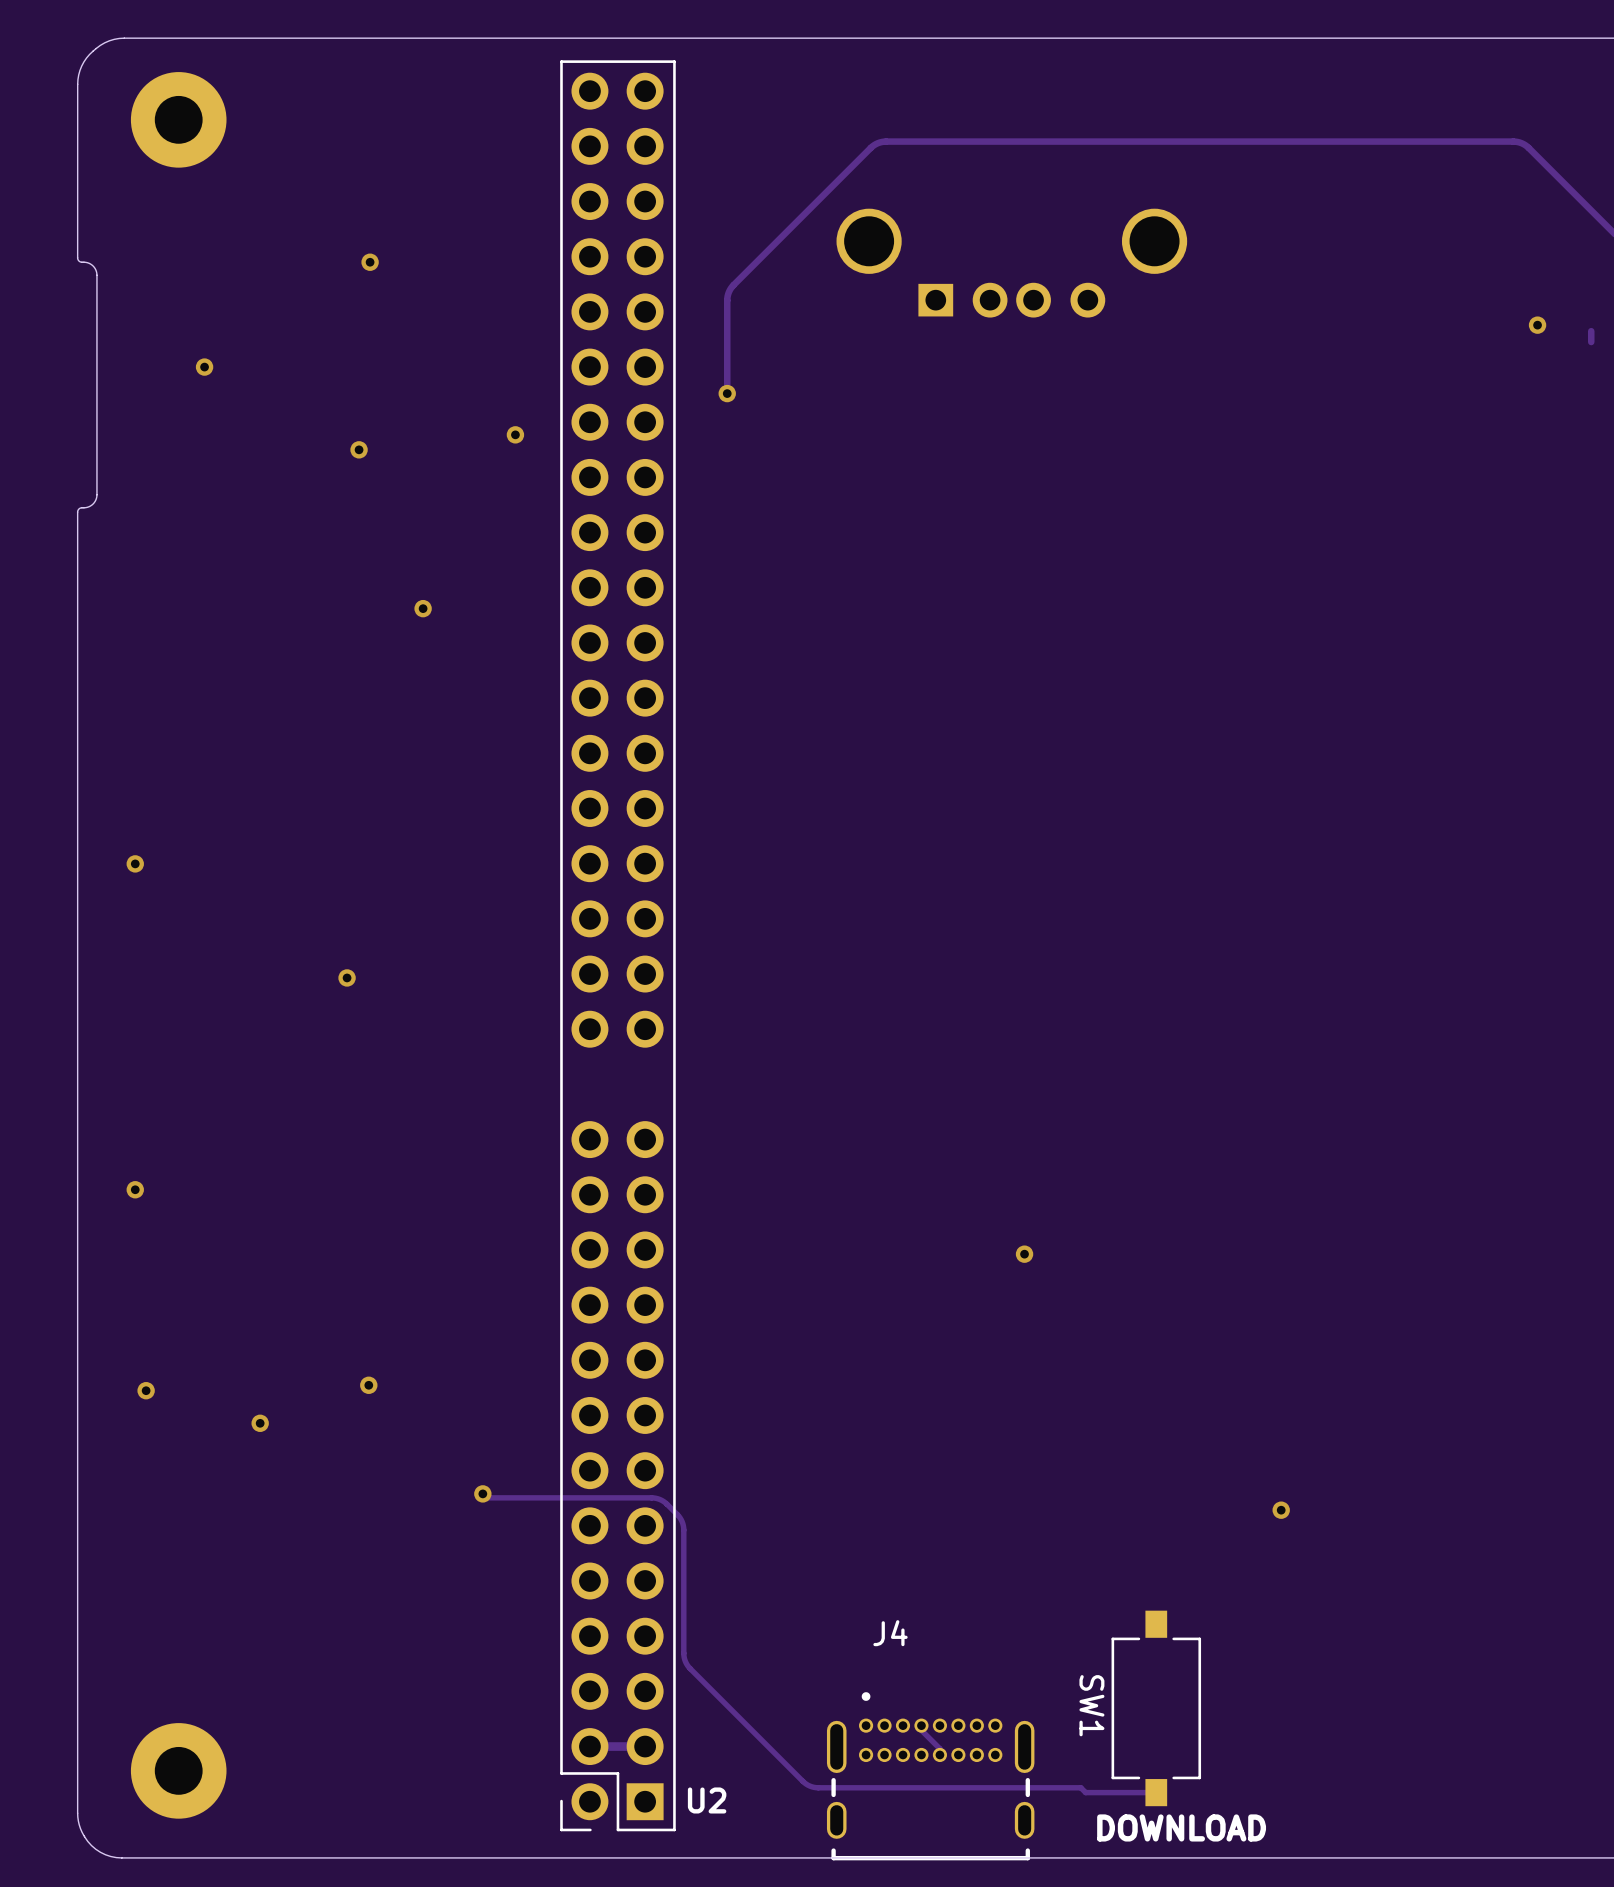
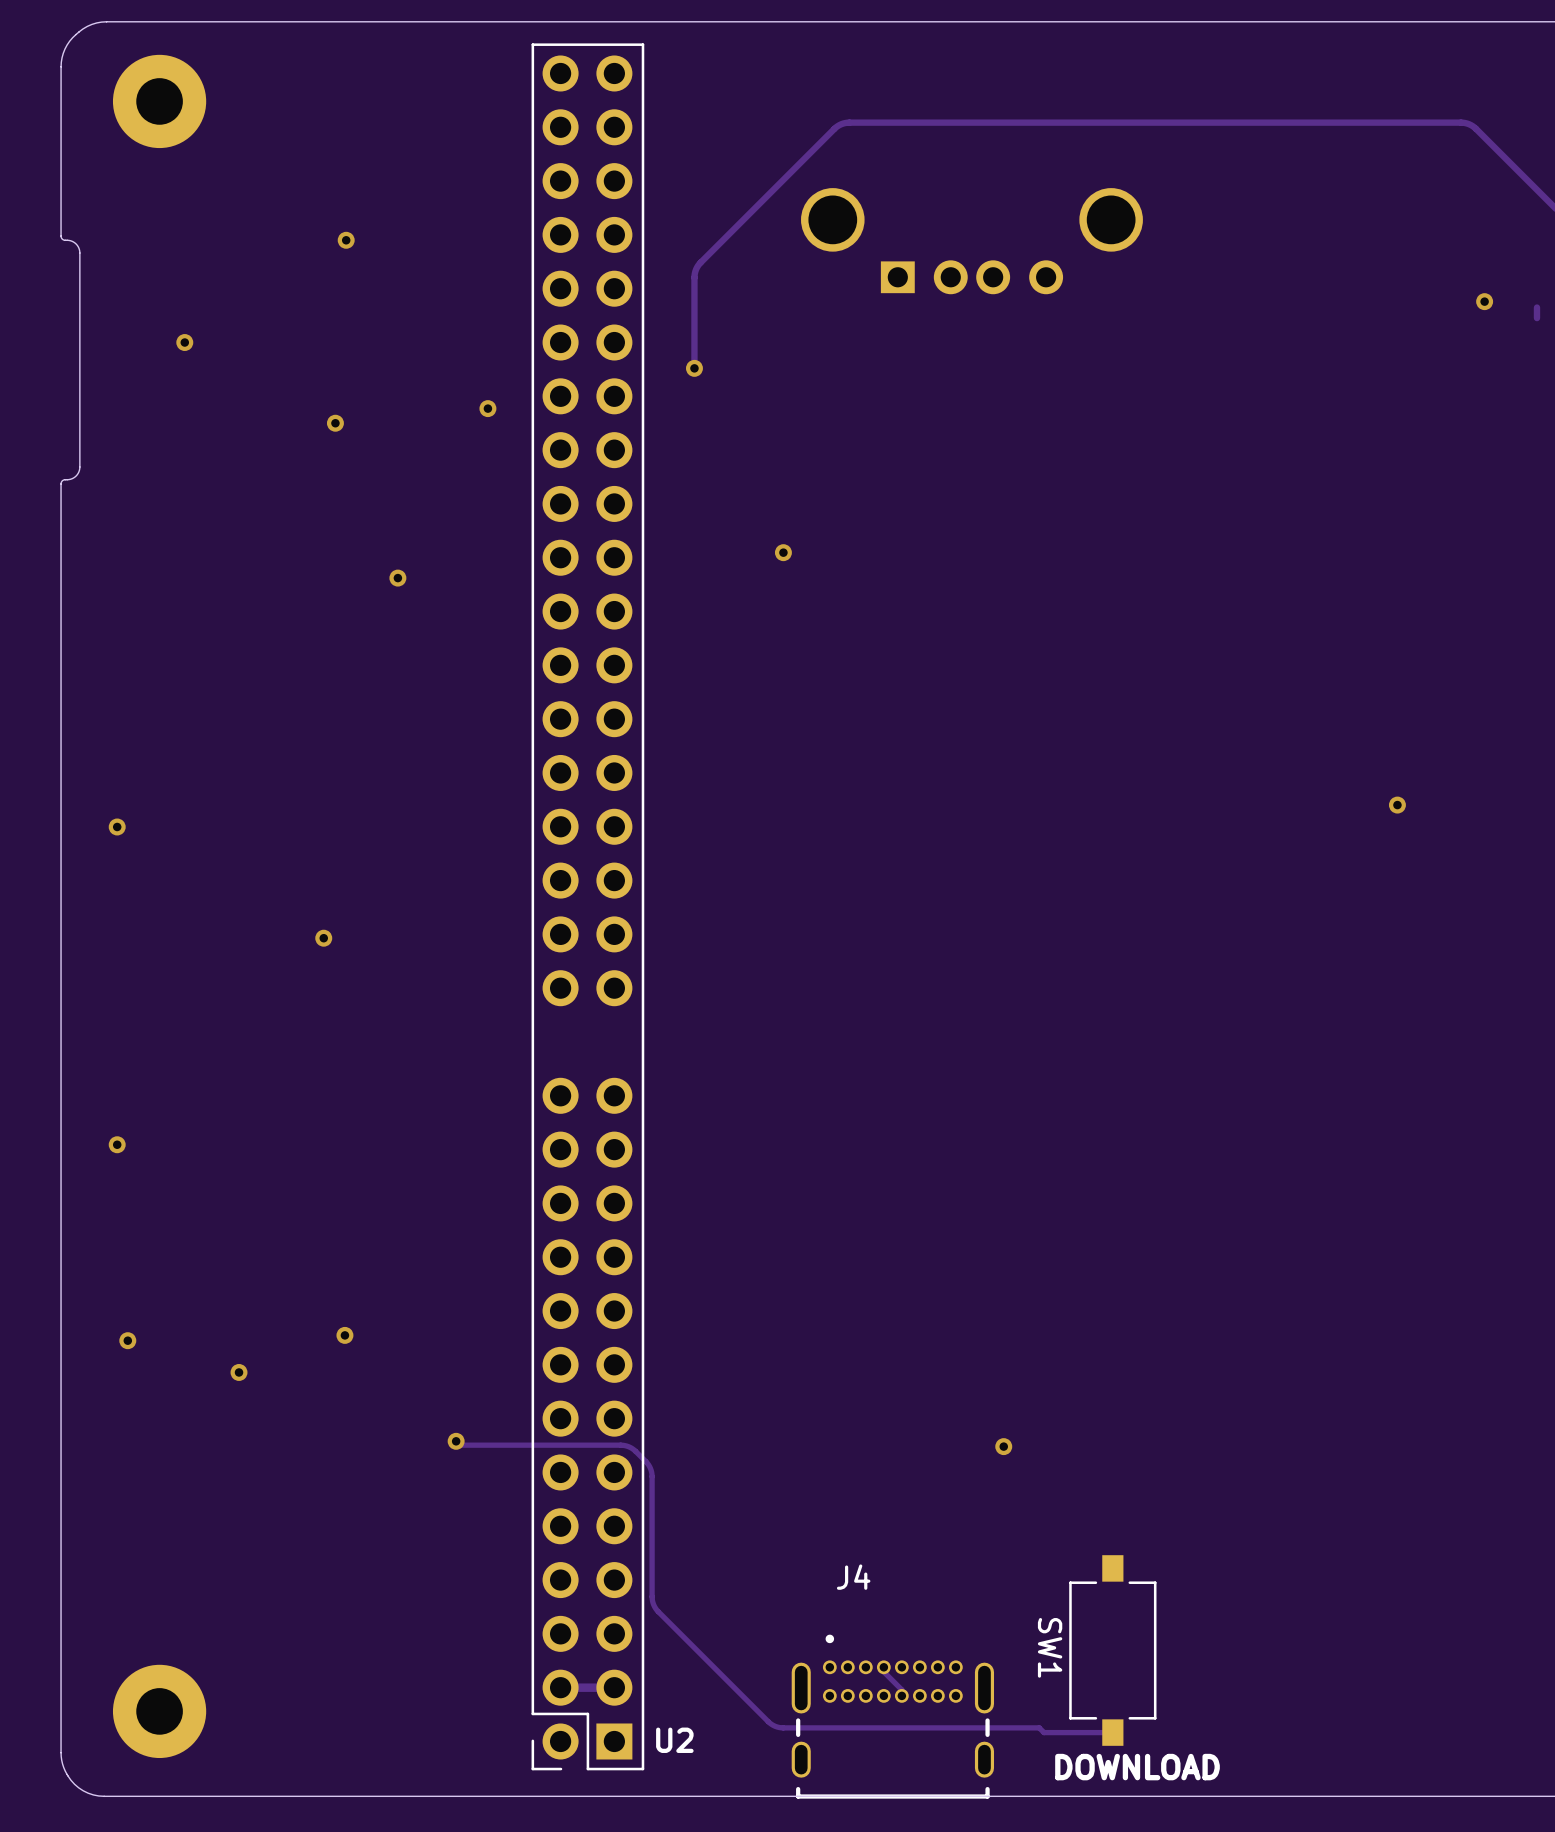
via: none -> (783, 552)
via: none -> (1397, 805)
via: (1024, 1254) -> none
via: none -> (1003, 1446)
via: (1281, 1510) -> none

